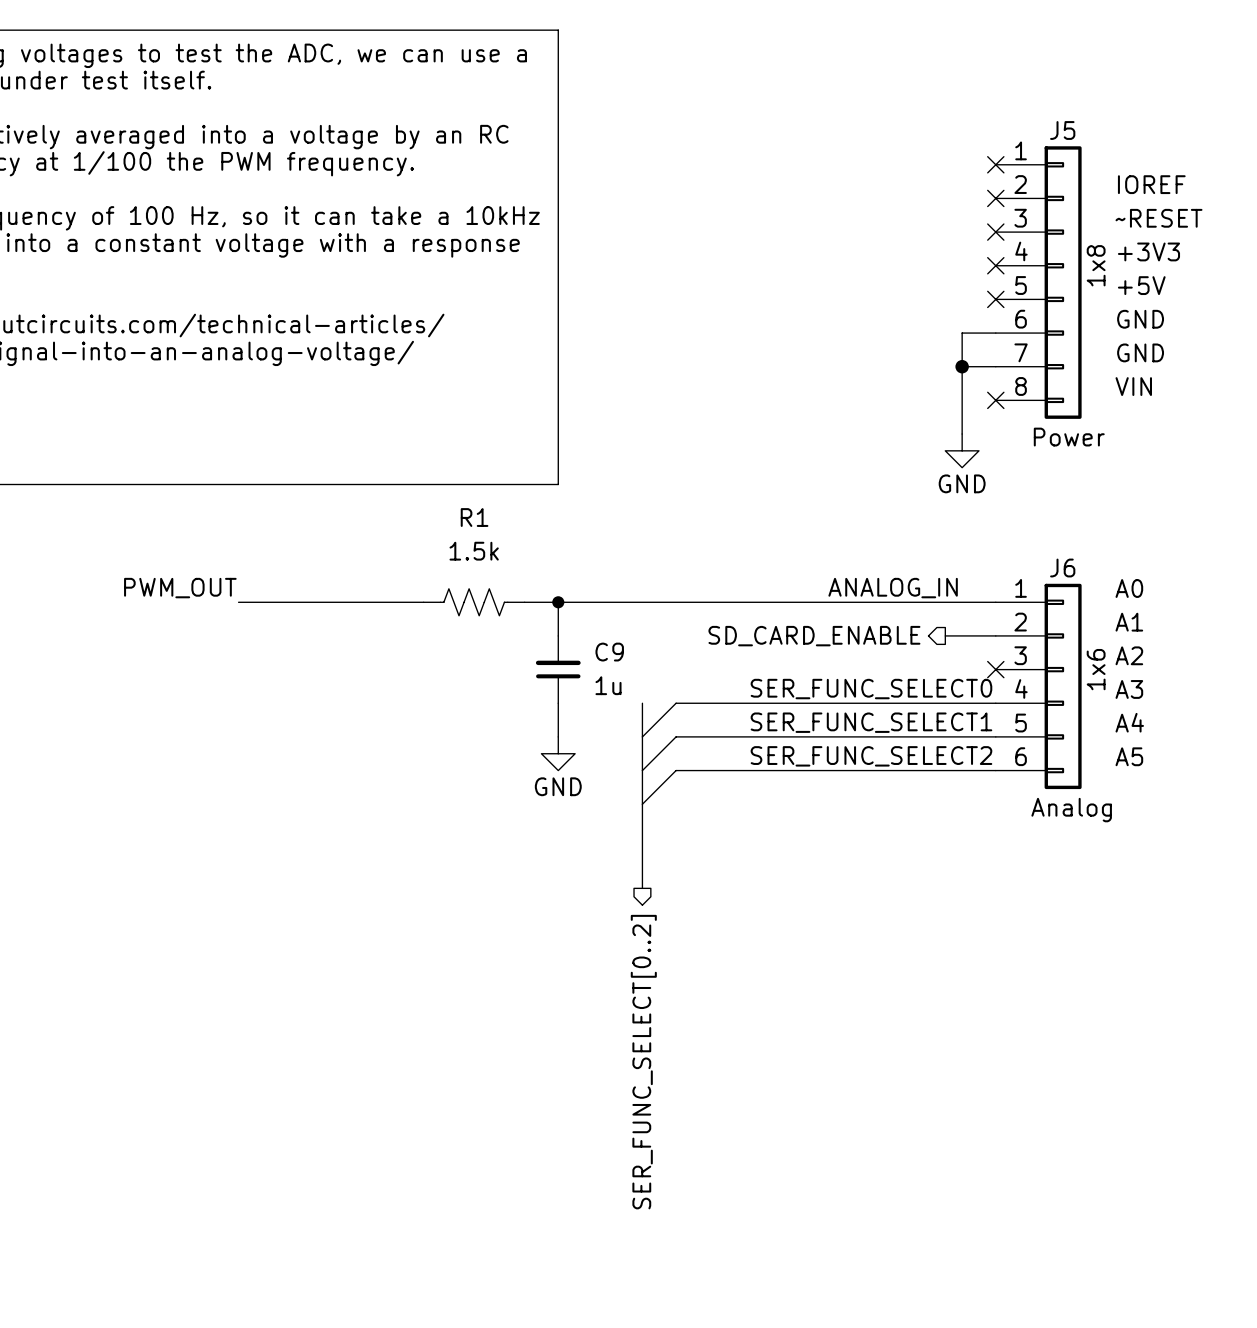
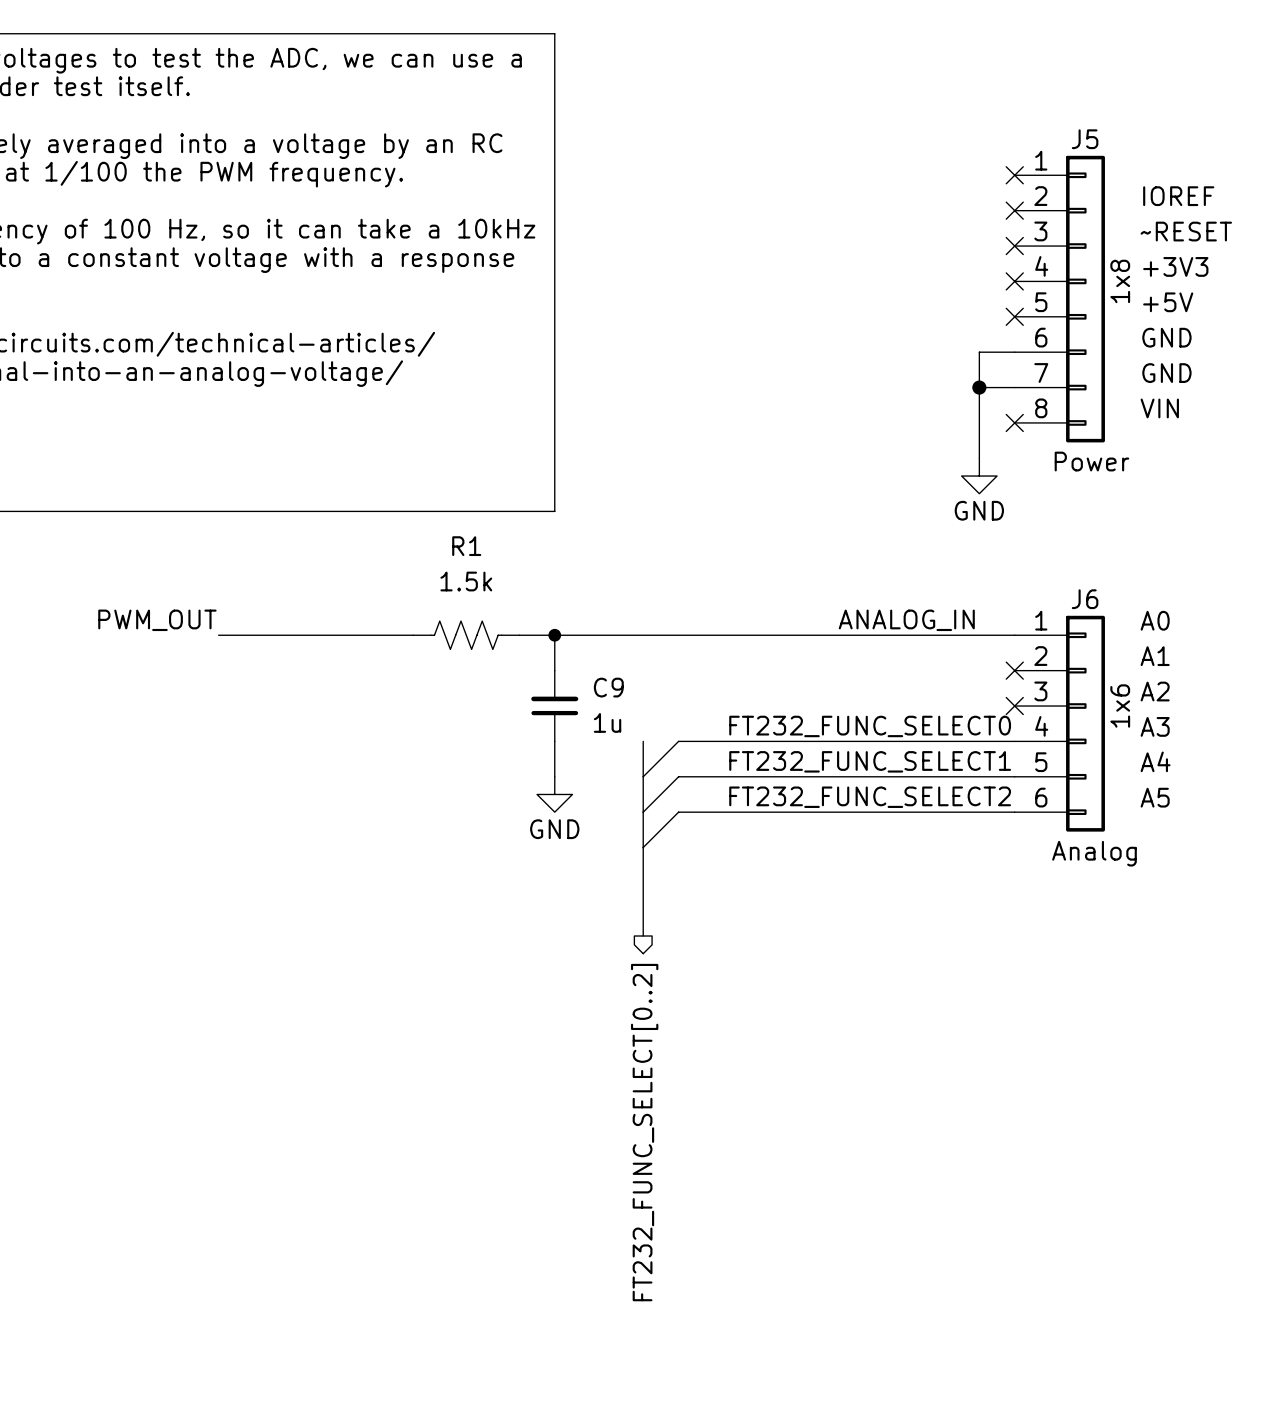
wire: (945, 635) (995, 635) -> none
no-connect mark: none -> (1014, 670)
hierarchical label: SD_CARD_ENABLE (814, 636) -> none
label: SER_FUNC_SELECT0 (871, 689) -> FT232_FUNC_SELECT0 (870, 726)
label: SER_FUNC_SELECT1 (871, 722) -> FT232_FUNC_SELECT1 (870, 761)
label: SER_FUNC_SELECT2 (871, 756) -> FT232_FUNC_SELECT2 (870, 797)
hierarchical label: SER_FUNC_SELECT[0..2] (643, 1062) -> FT232_FUNC_SELECT[0..2] (644, 1132)

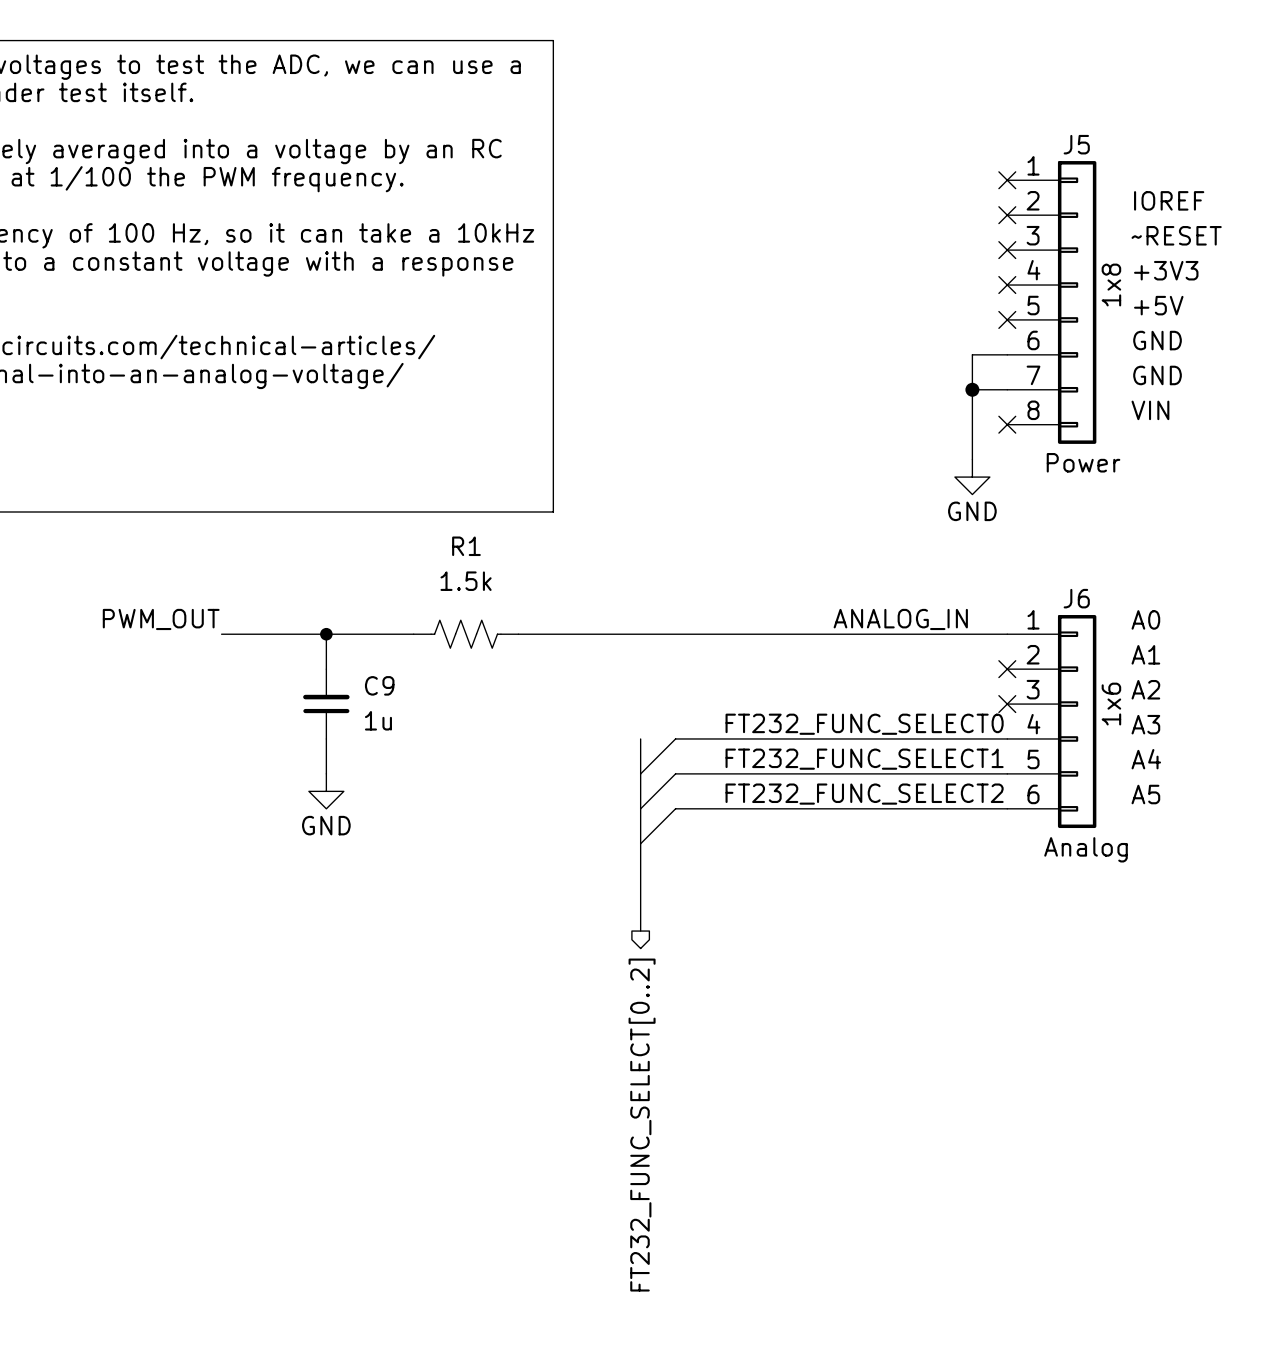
junction: none -> (326, 634)
wire: (554, 635) (554, 670) -> (326, 634) (326, 669)
junction: (554, 635) -> none
C9 position: (554, 706) -> (326, 704)
wire: (554, 741) (554, 776) -> (326, 738) (326, 773)
power symbol position: GND (554, 794) -> GND (326, 791)

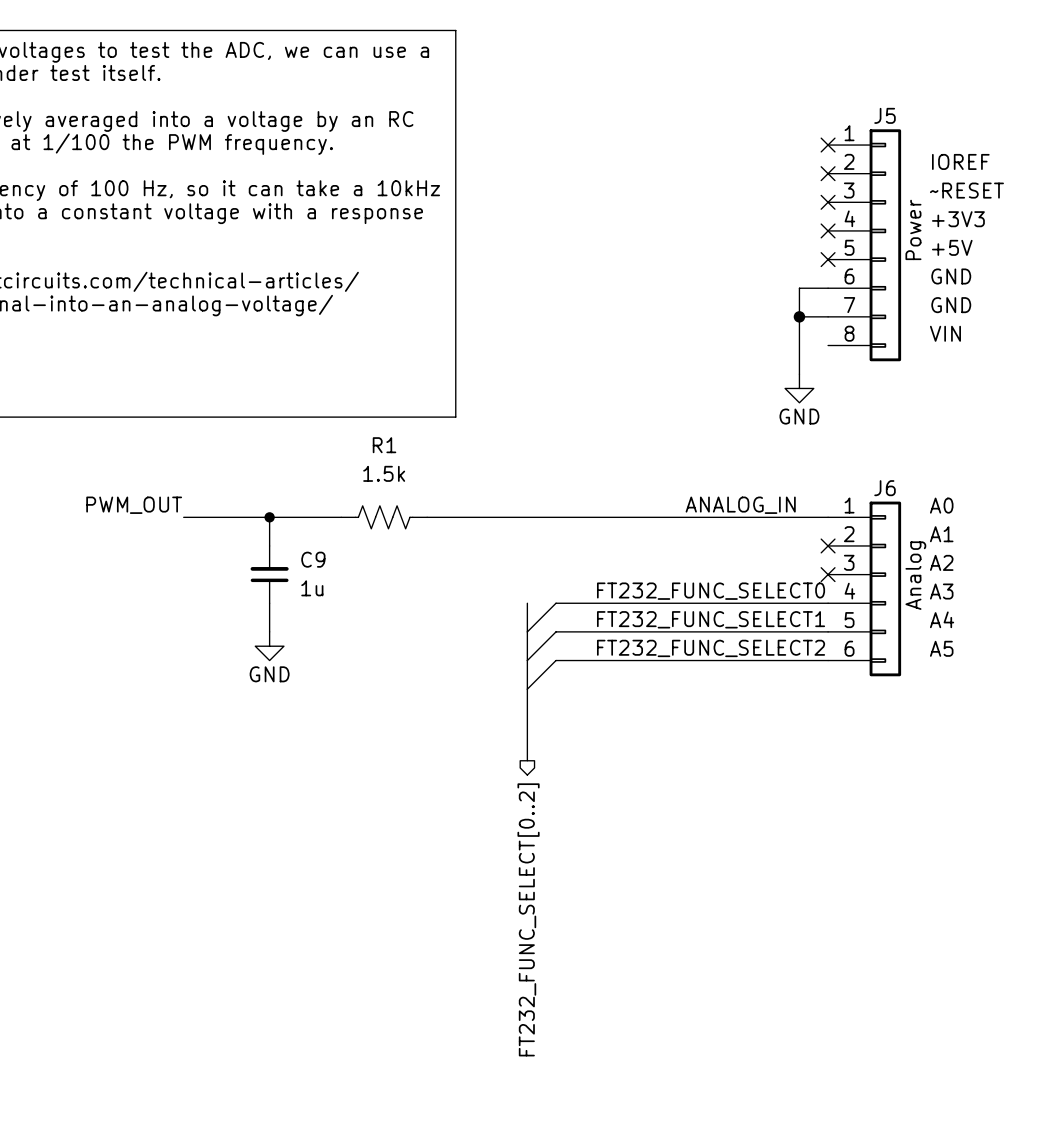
J5 value: 1x8 (1111, 285) -> Power (913, 229)
no-connect mark: (1007, 424) -> none
text: Power (1083, 462) -> none
J6 value: 1x6 (1111, 704) -> Analog (915, 575)
text: Analog (1086, 849) -> none

